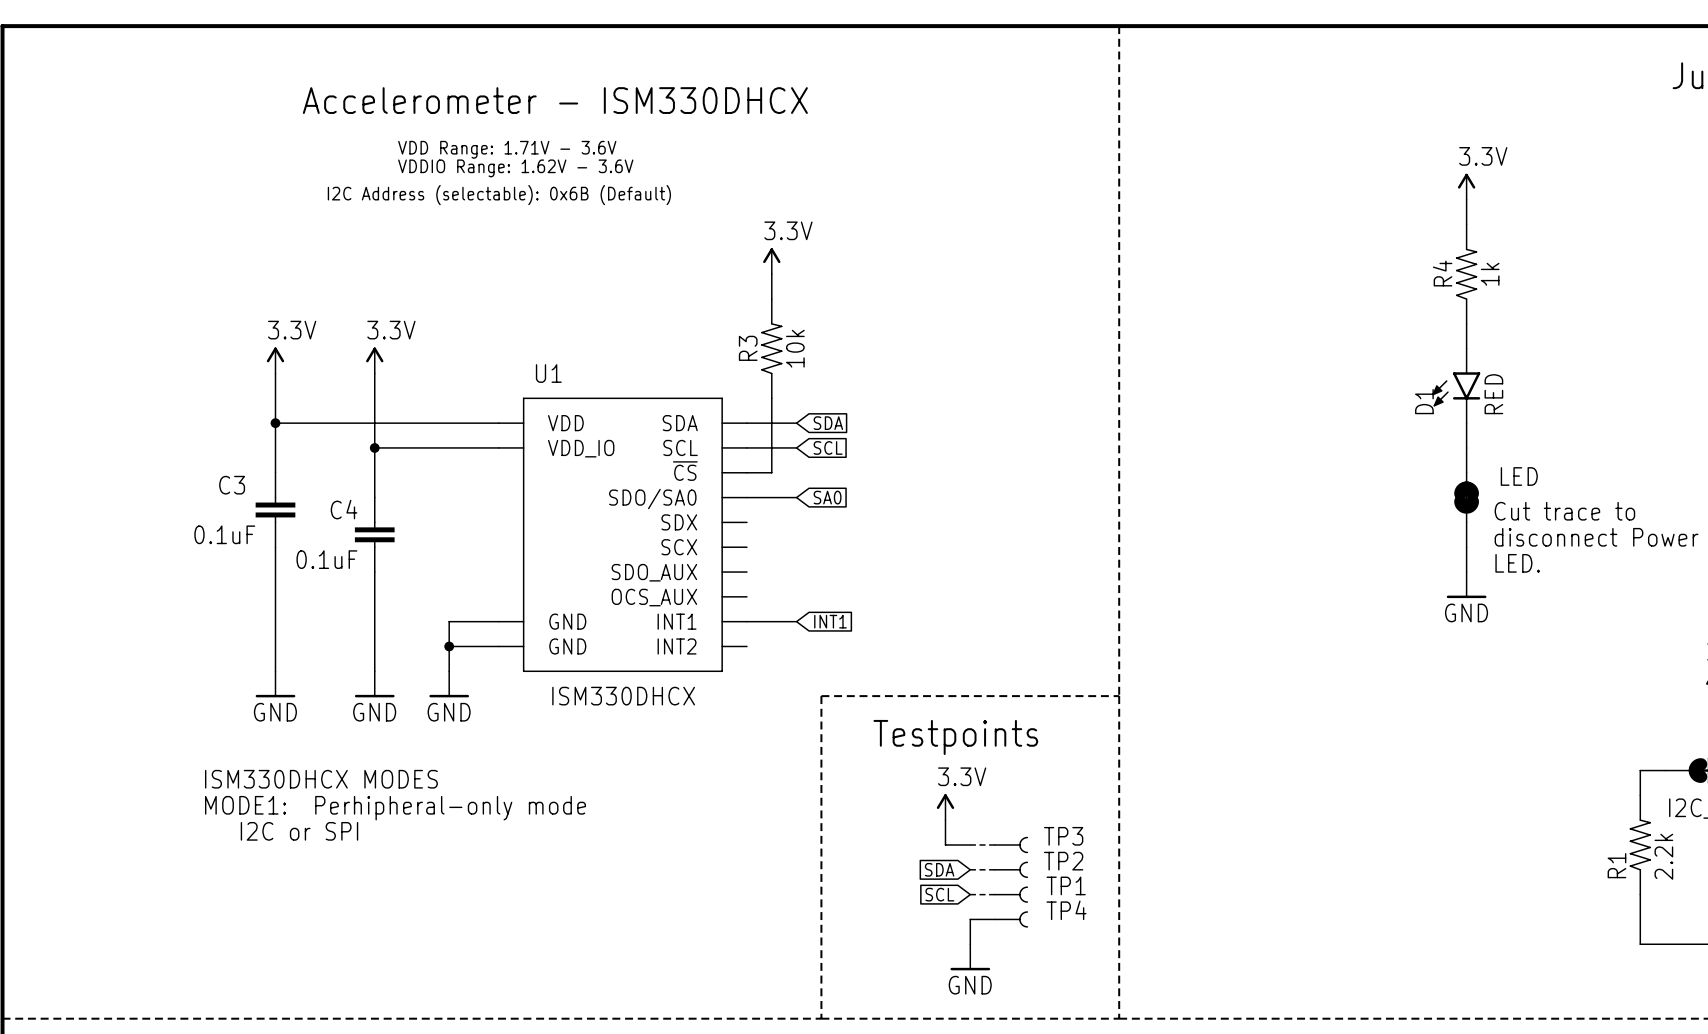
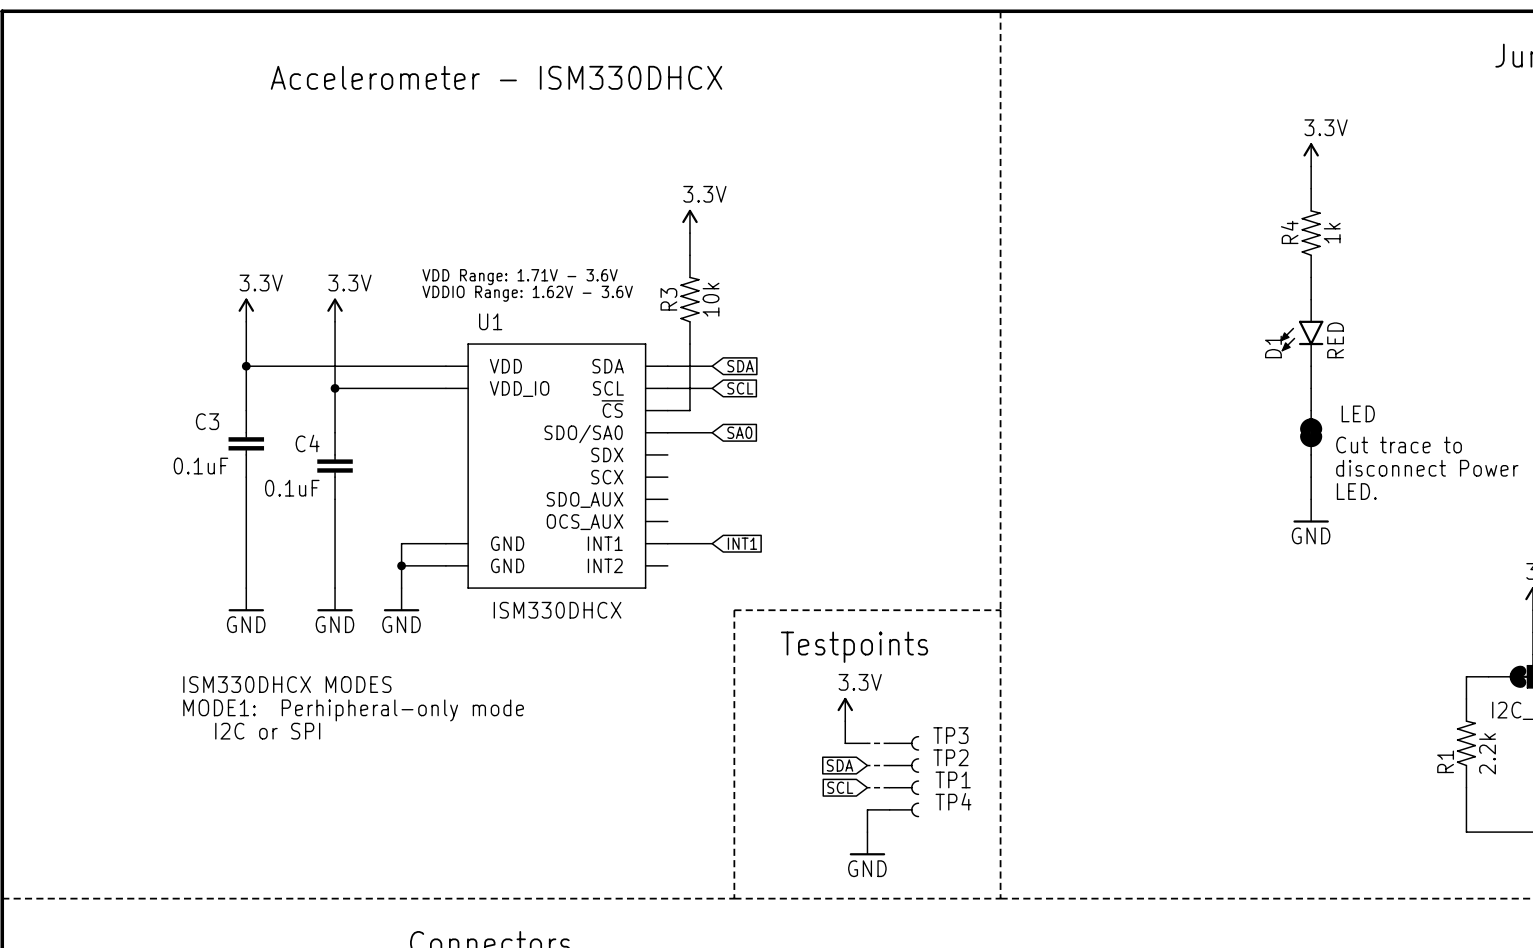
text position: VDD Range: 1.71V - 3.6V (507, 149) -> VDD Range: 1.71V - 3.6V (520, 277)
text position: VDDIO Range: 1.62V - 3.6V (515, 168) -> VDDIO Range: 1.62V - 3.6V (527, 293)
text: I2C Address (selectable): 0x6B (Default) (499, 195) -> none

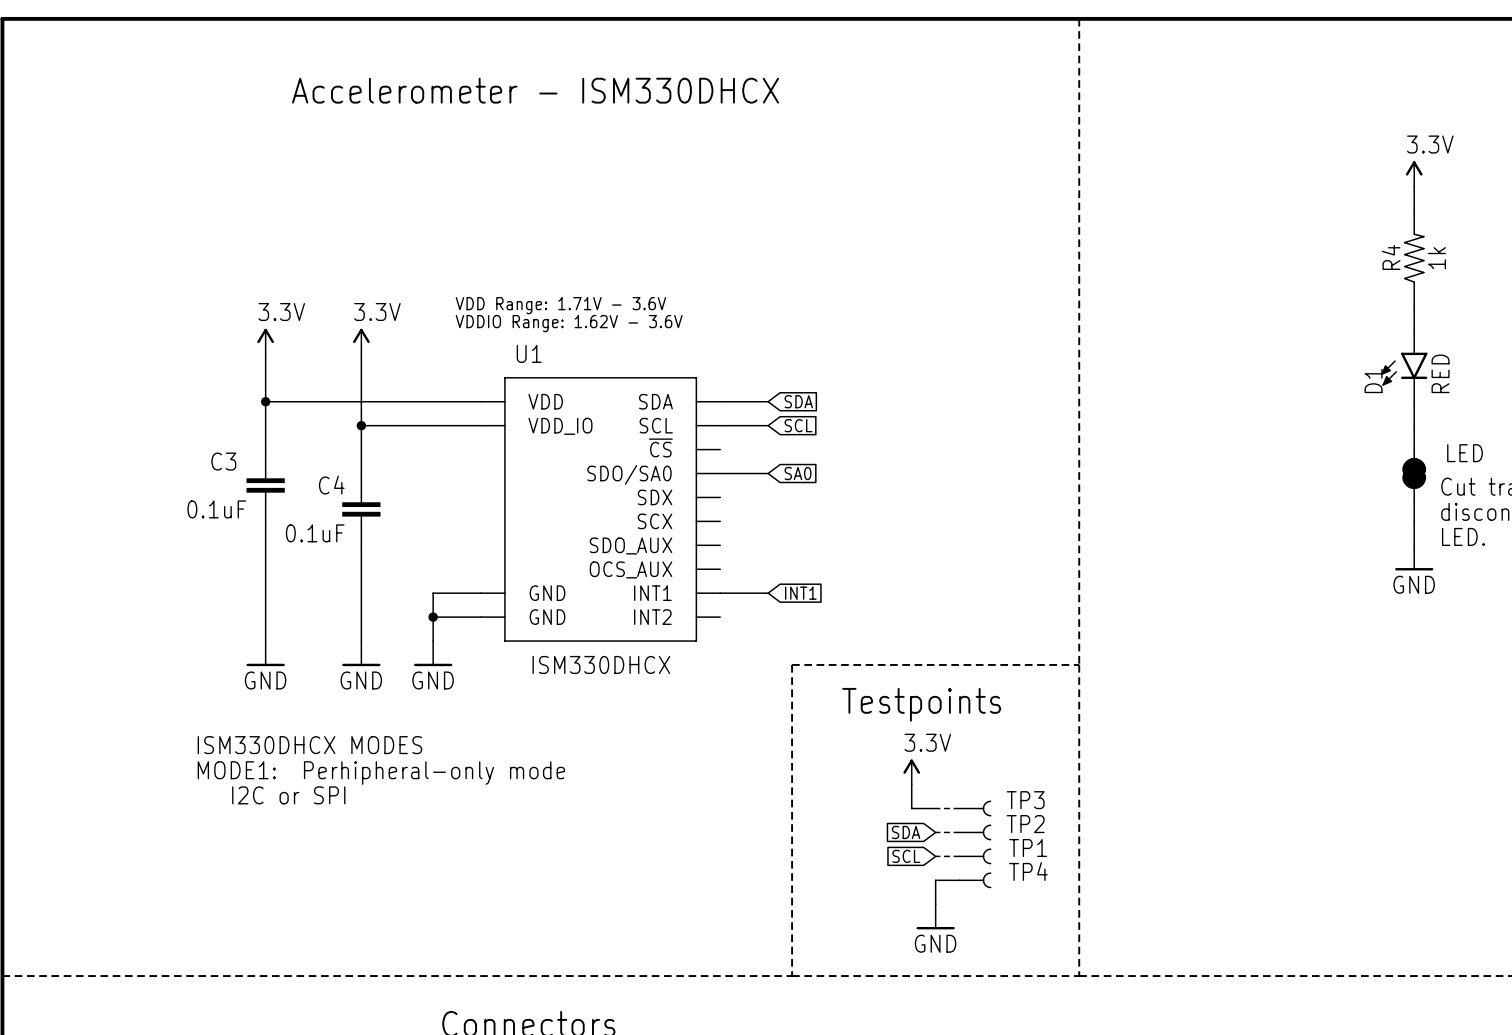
power symbol: 3.3V (689, 221) -> none
wire: (689, 233) (689, 255) -> none
R3: 10k (689, 299) -> none
wire: (689, 344) (689, 410) (667, 410) -> none

